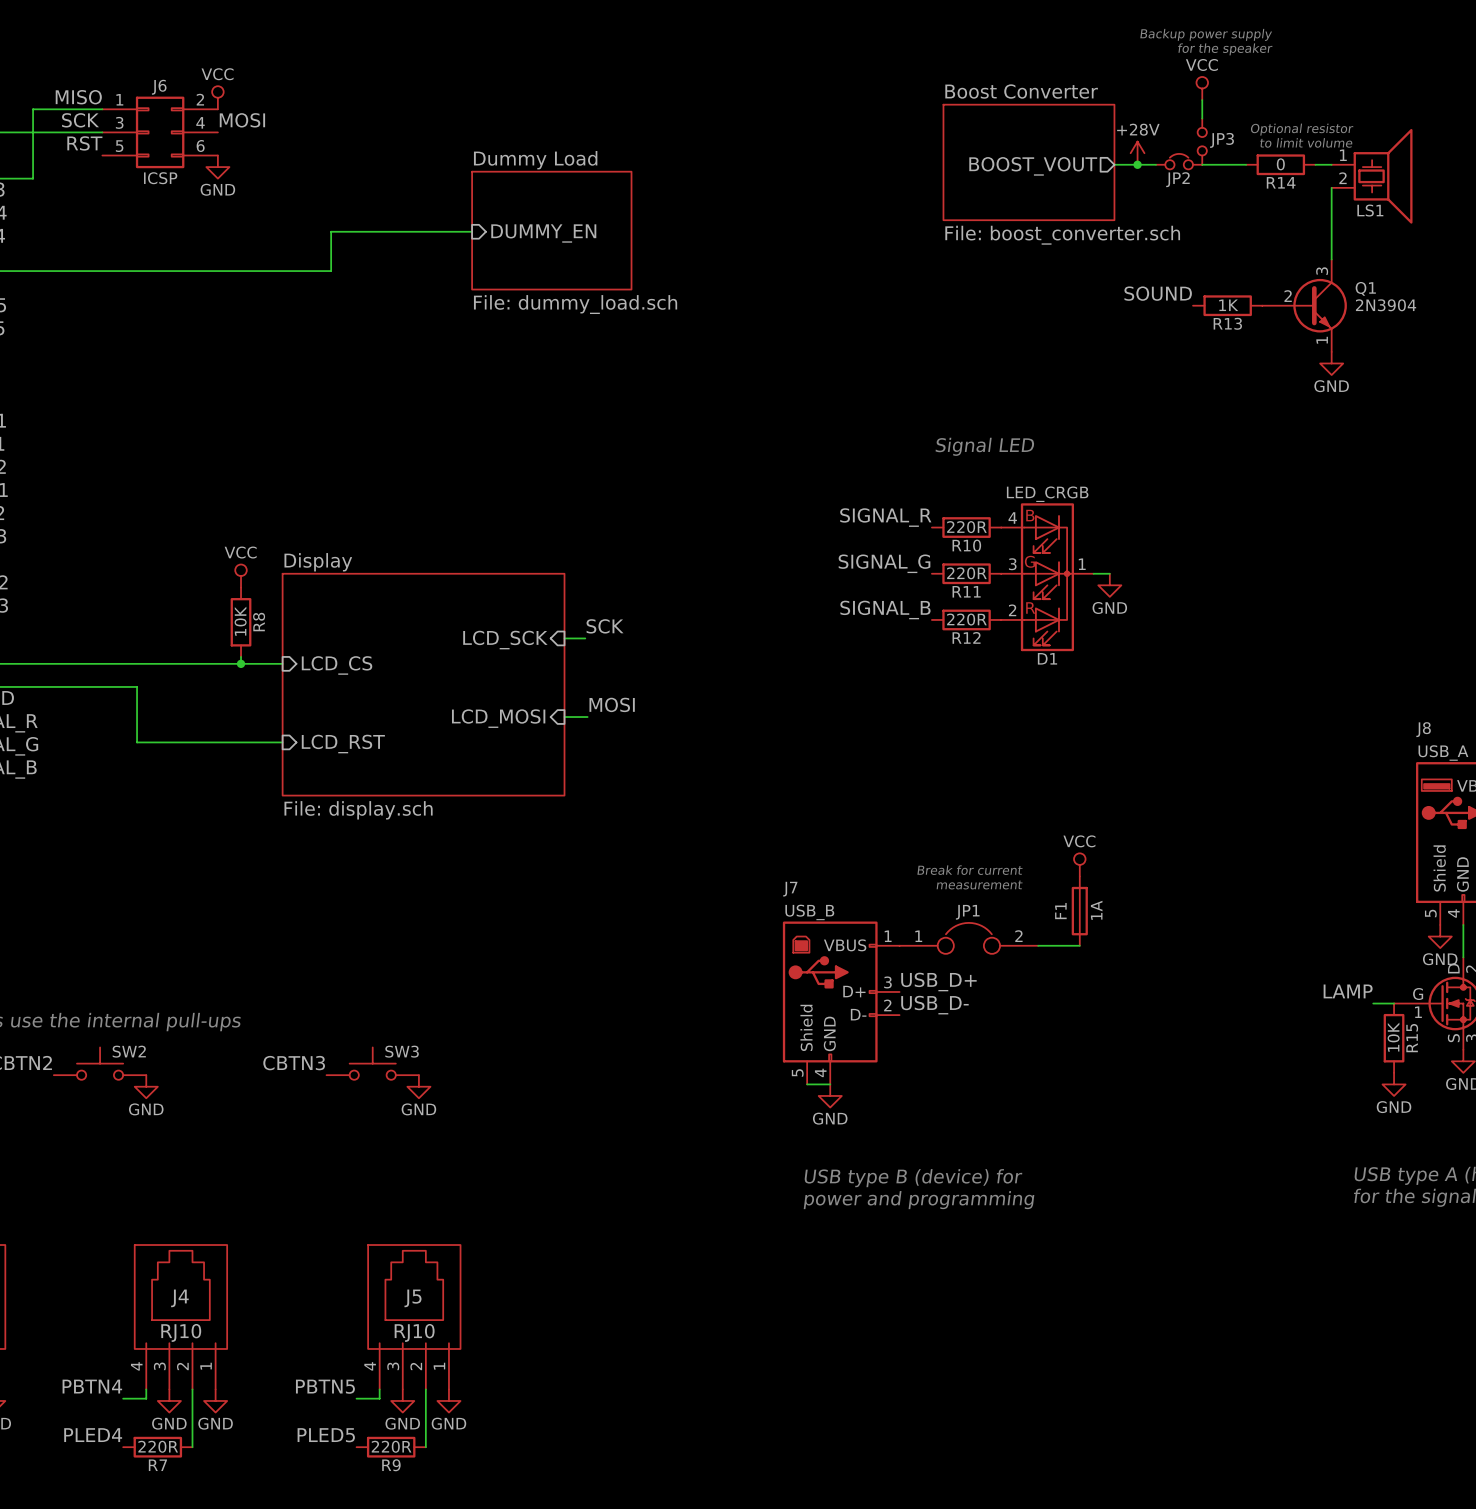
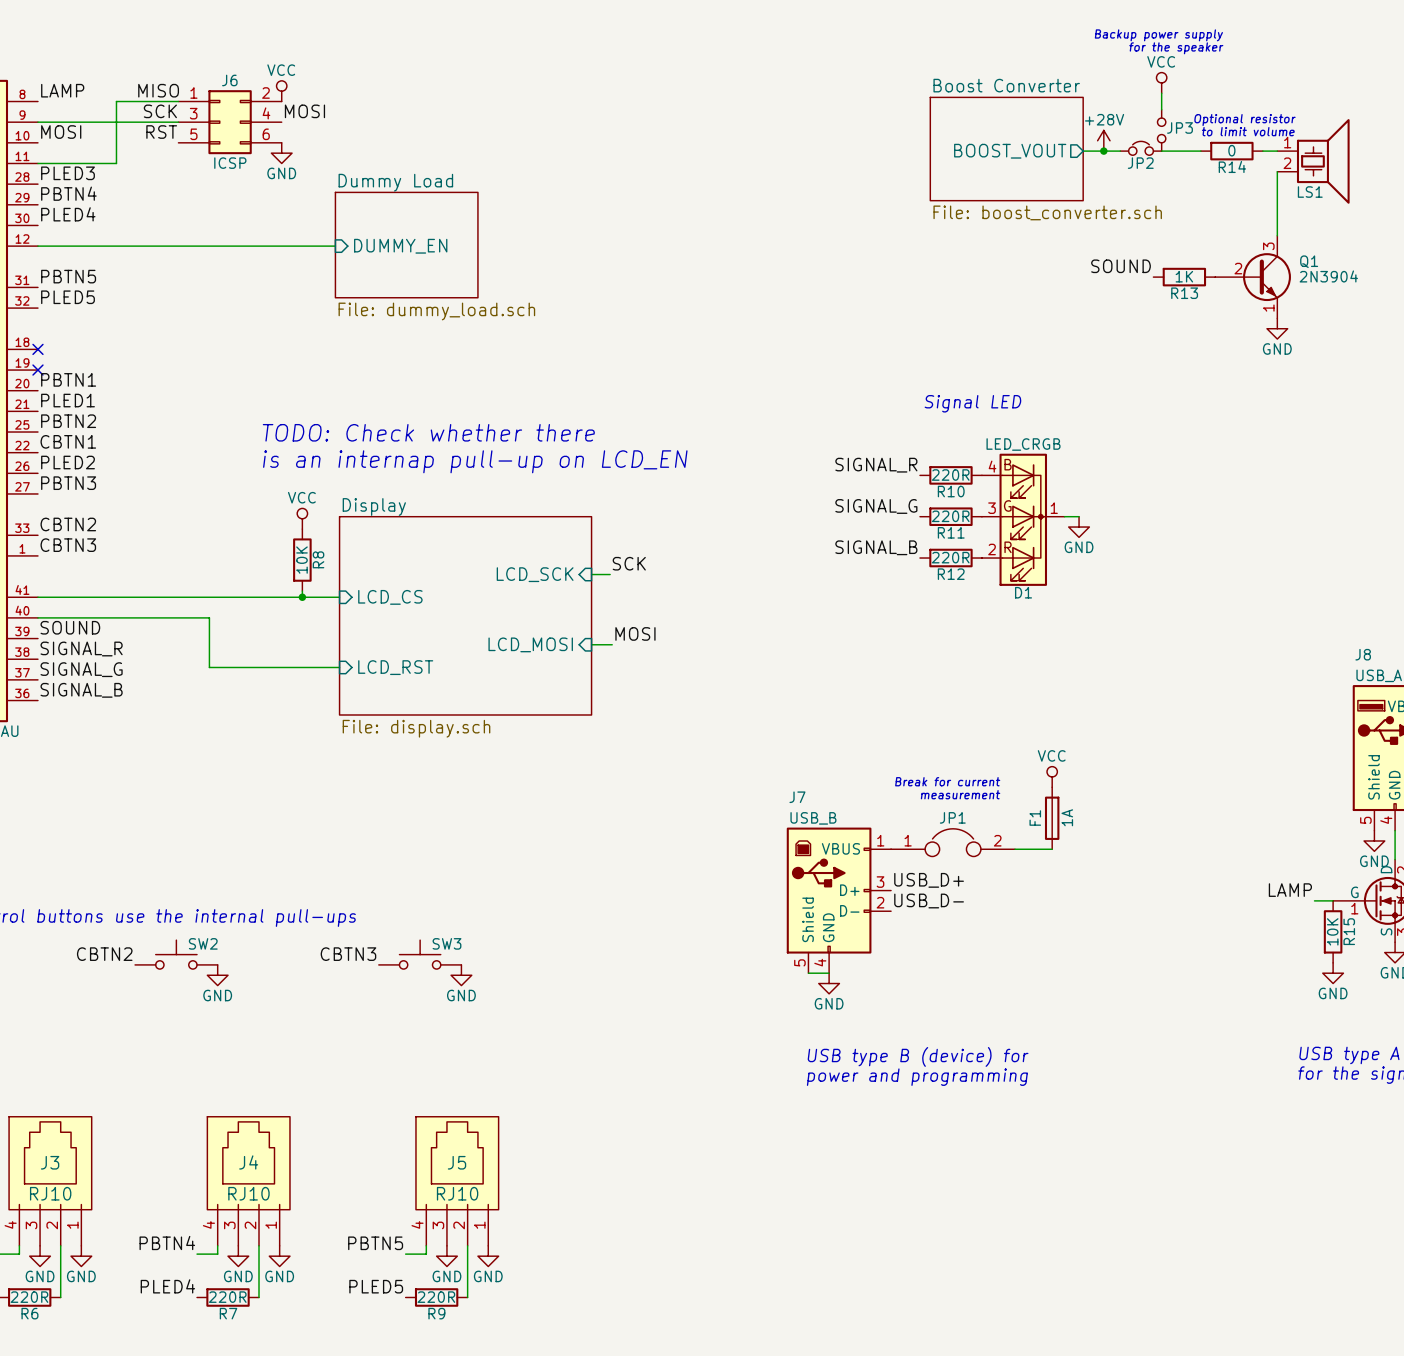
sheet Dummy Load position: (551, 230) -> (406, 245)
wire: (472, 231) (331, 231) (331, 271) (277, 271) -> none
sheet pin position: DUMMY_EN (543, 233) -> DUMMY_EN (400, 246)
text: none -> TODO: Check whether there (428, 432)
text: none -> is an internap pull-up on LCD_EN (475, 461)

